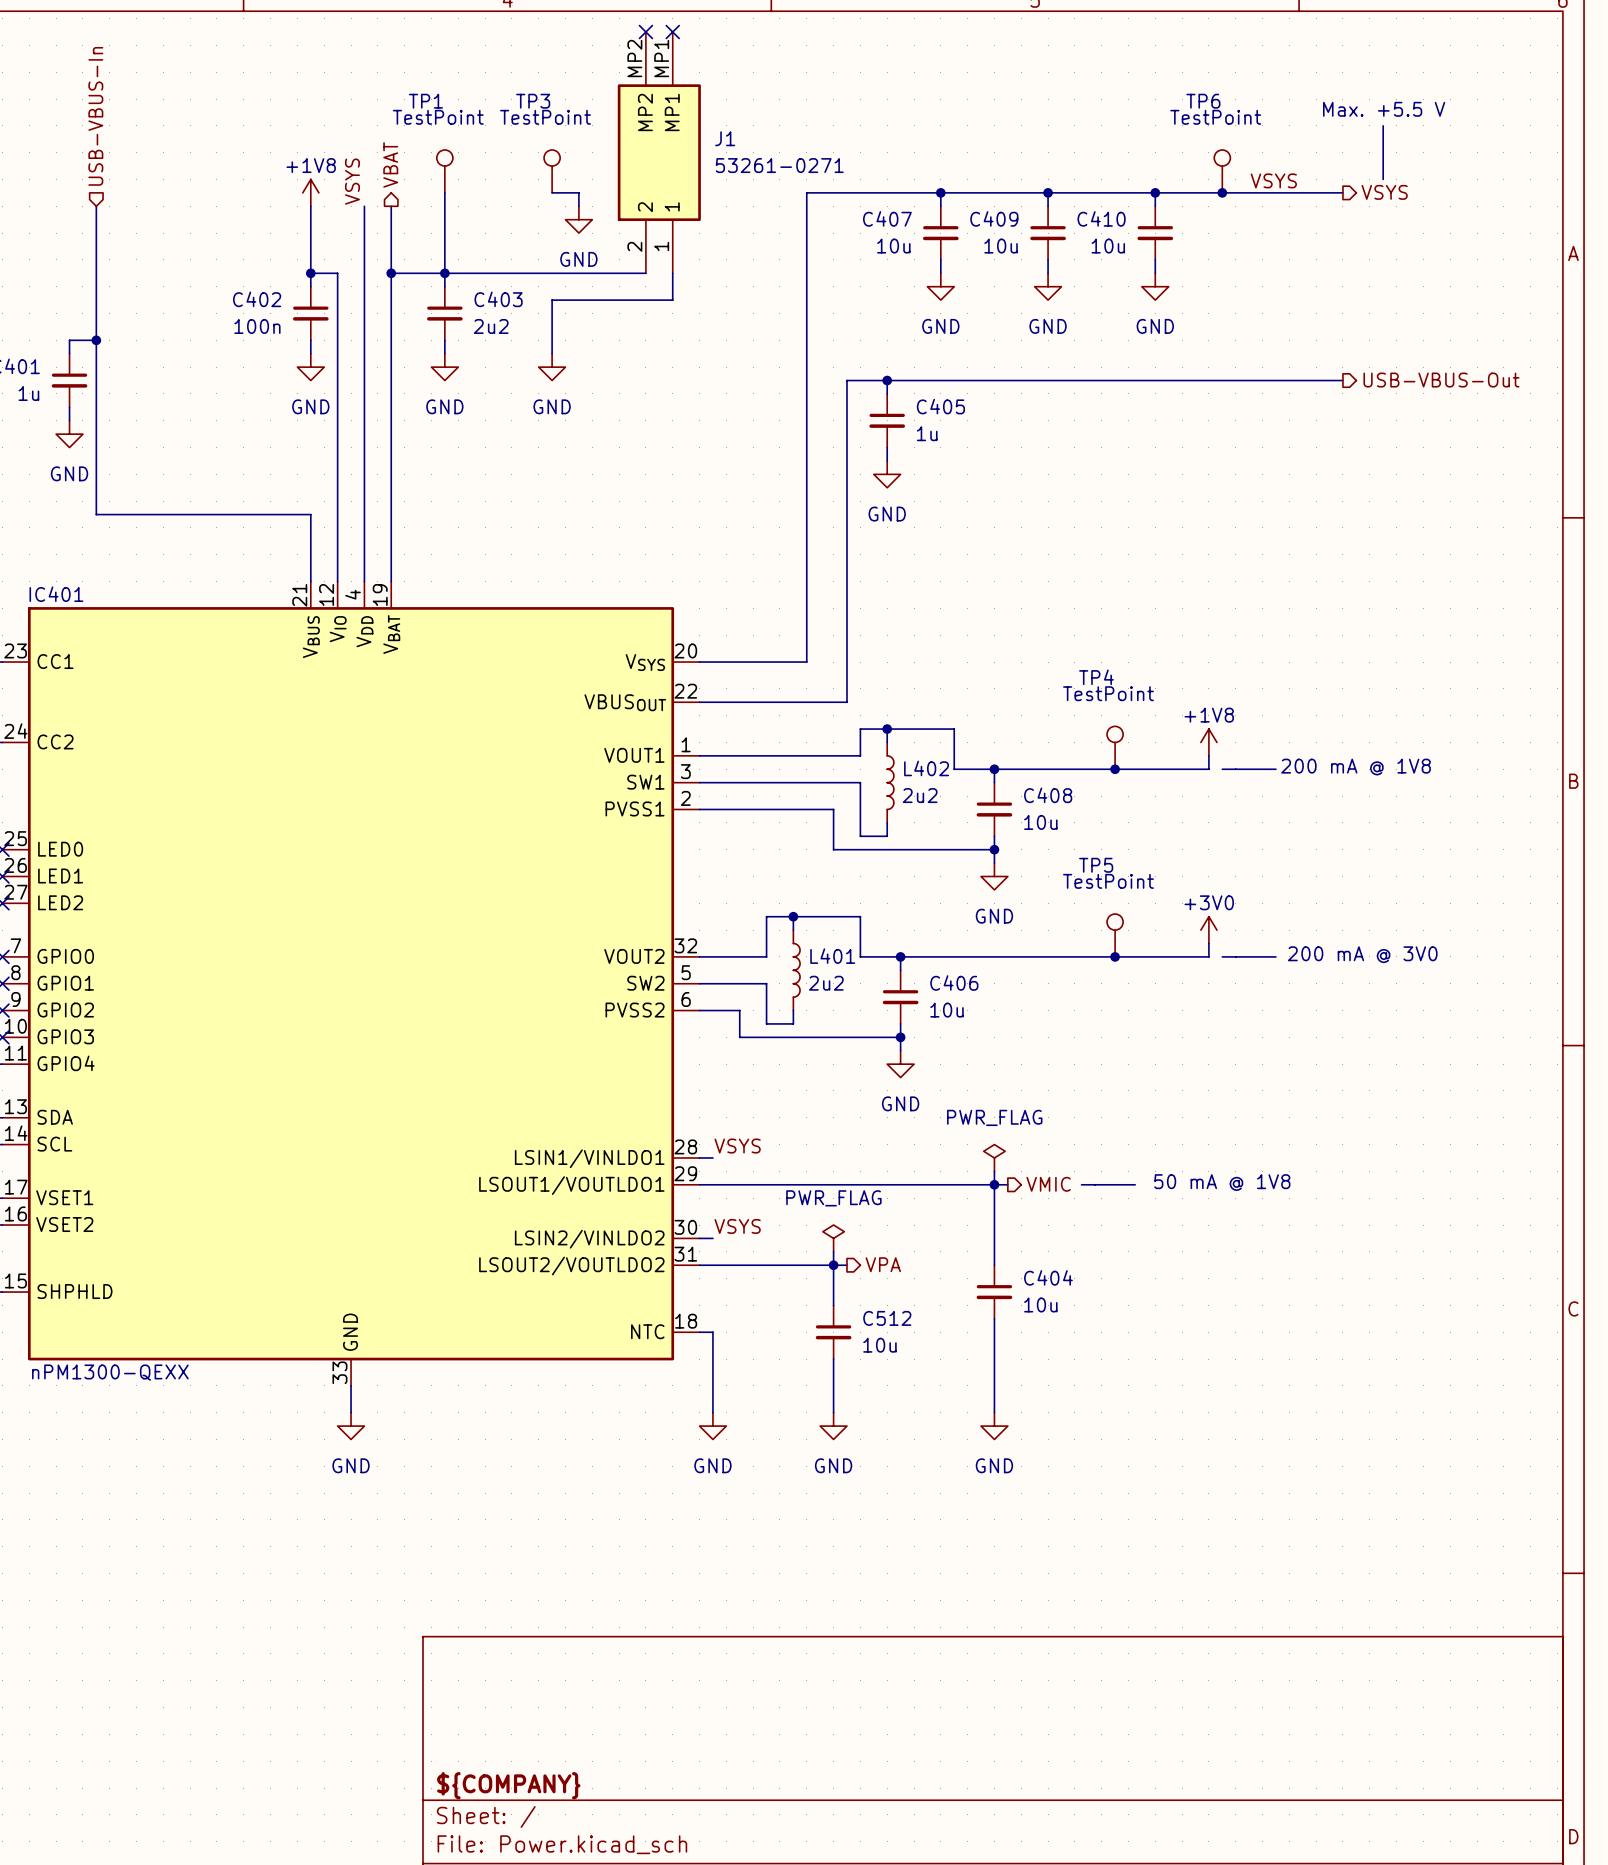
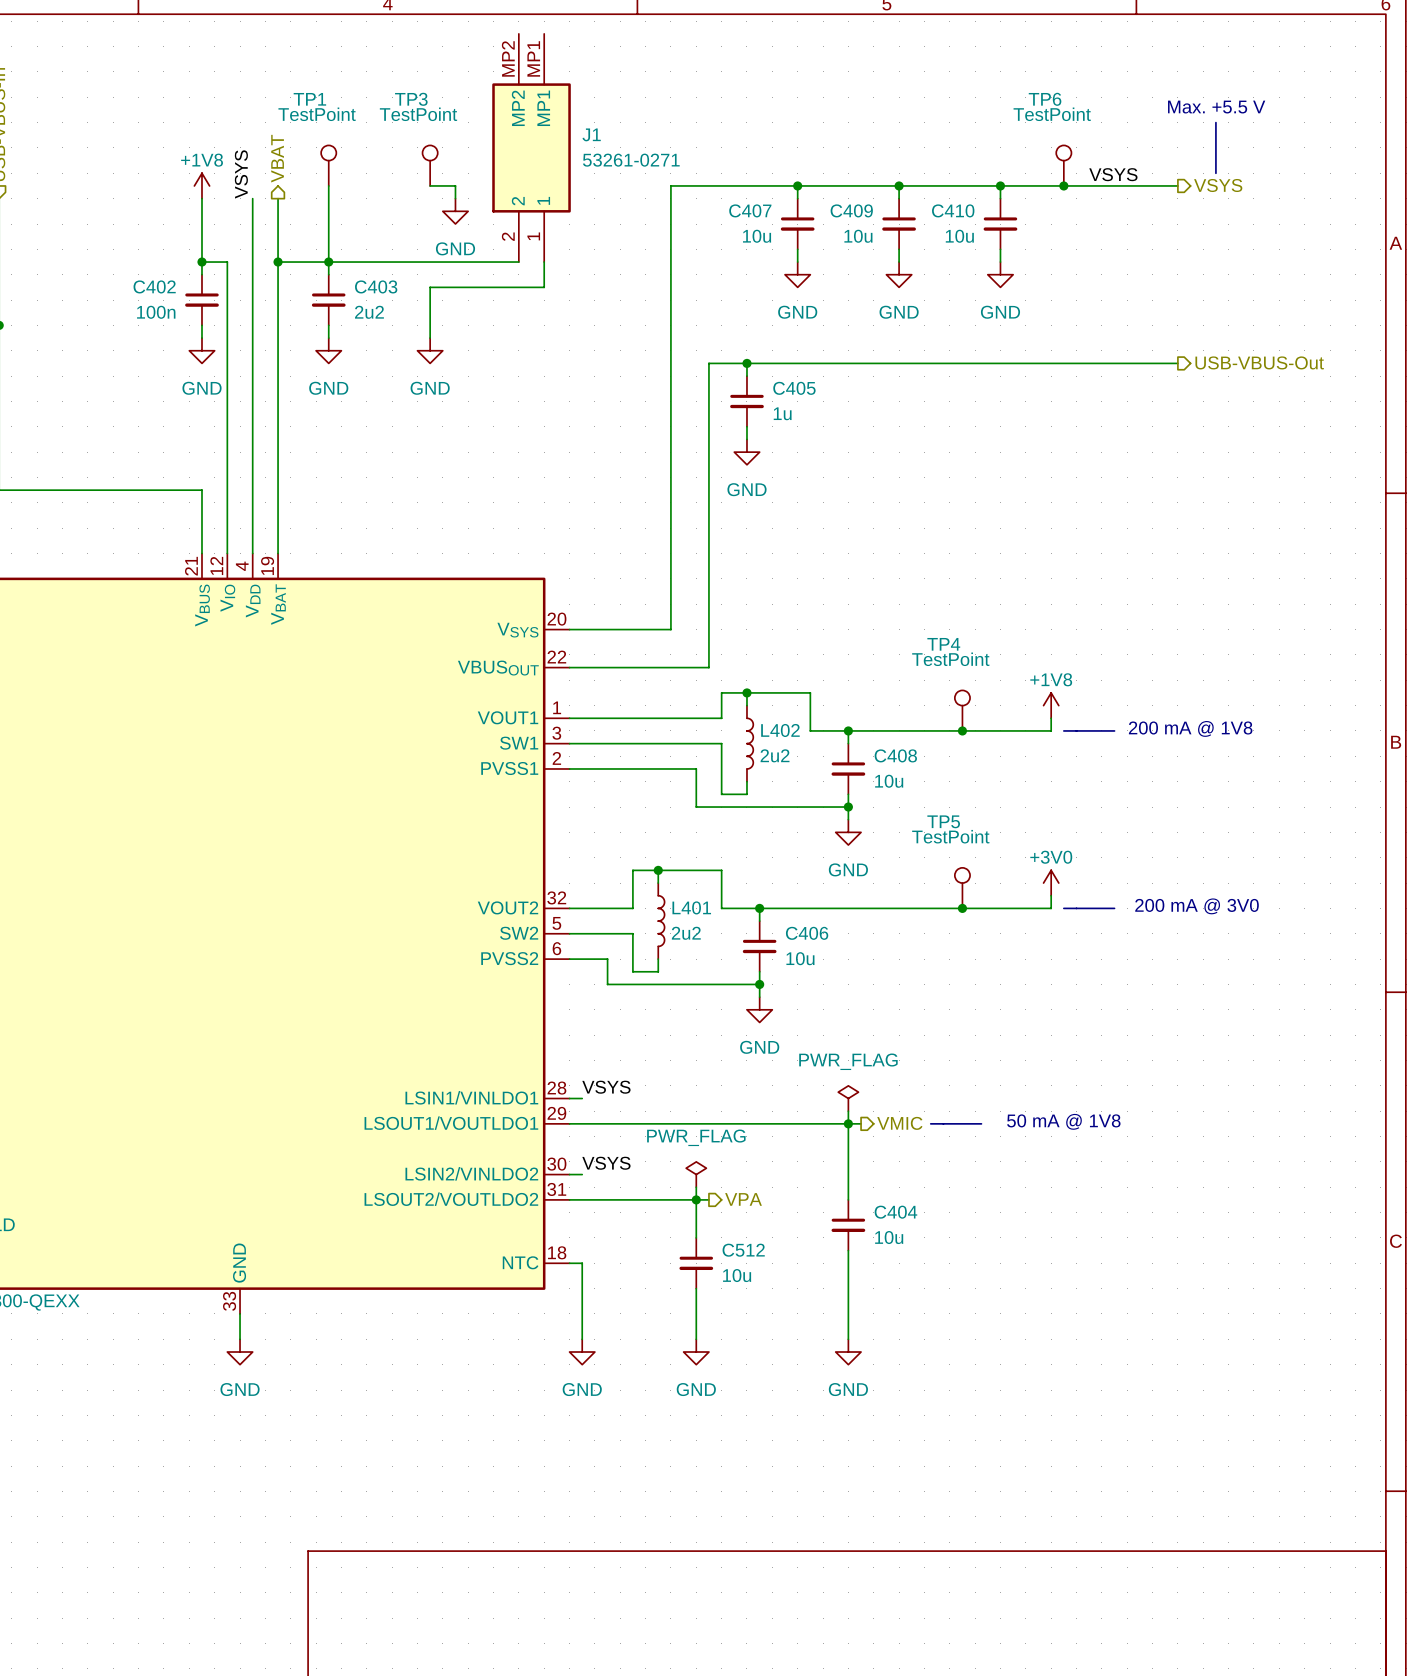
no-connect mark: (645, 32) -> none
no-connect mark: (672, 32) -> none

